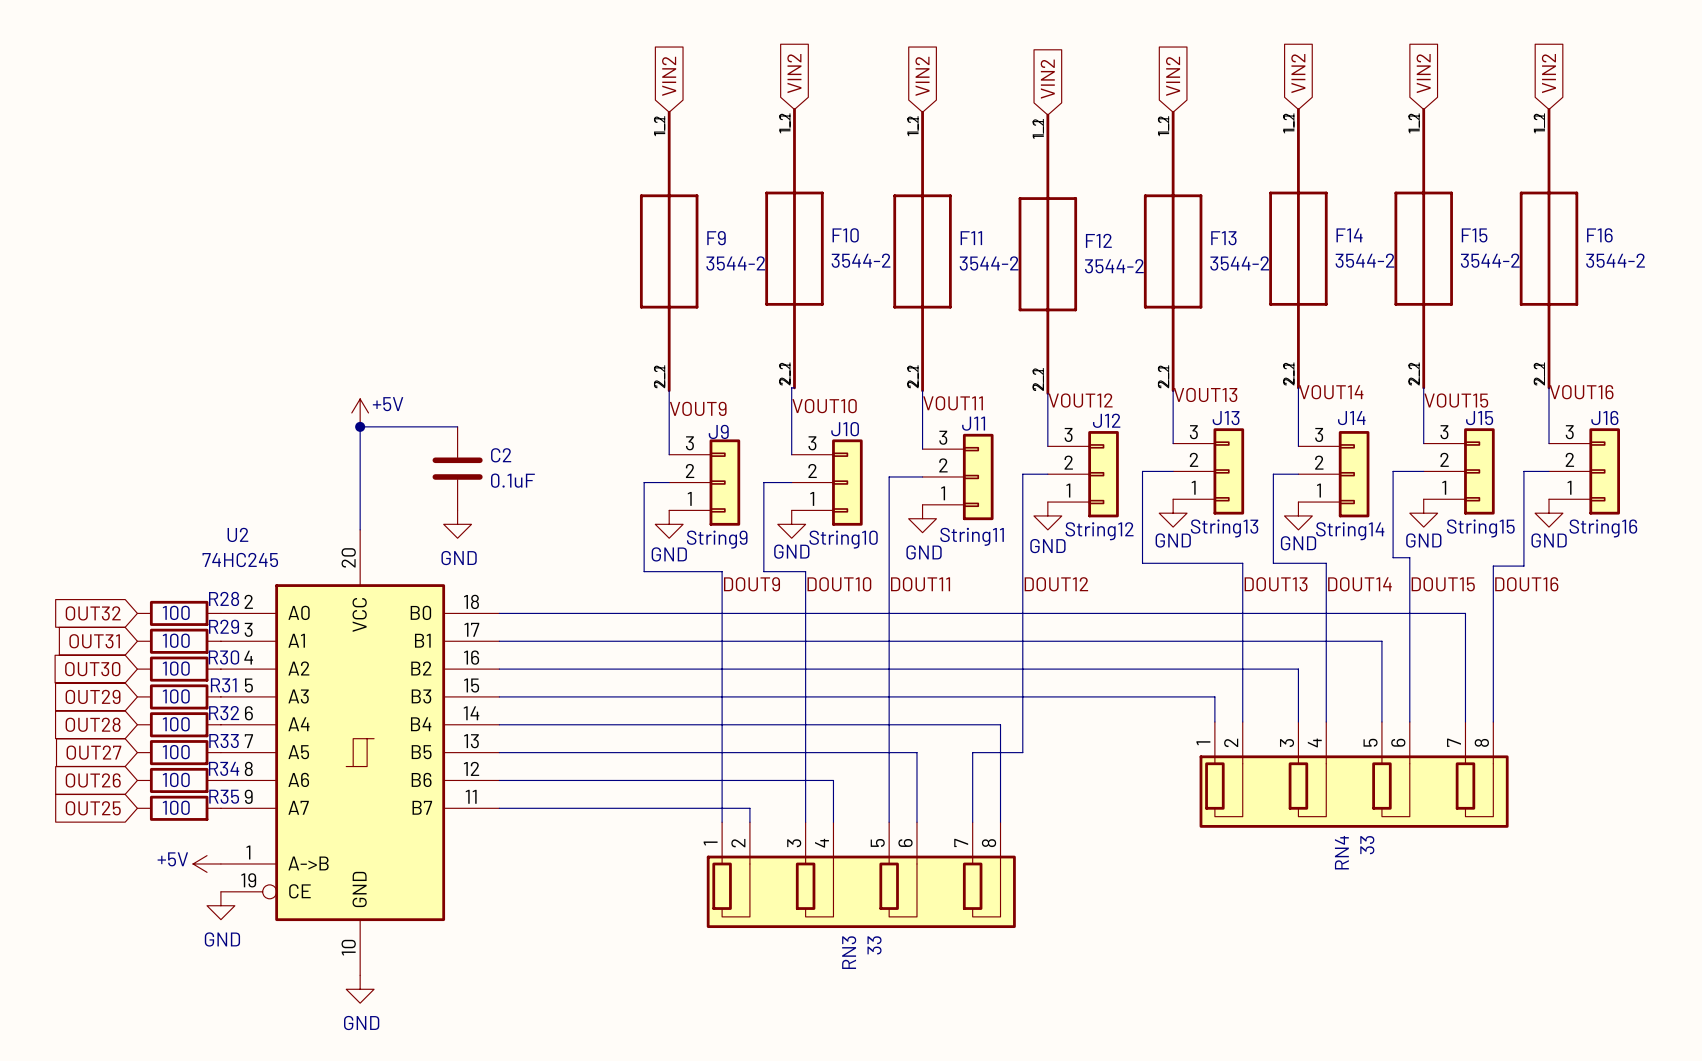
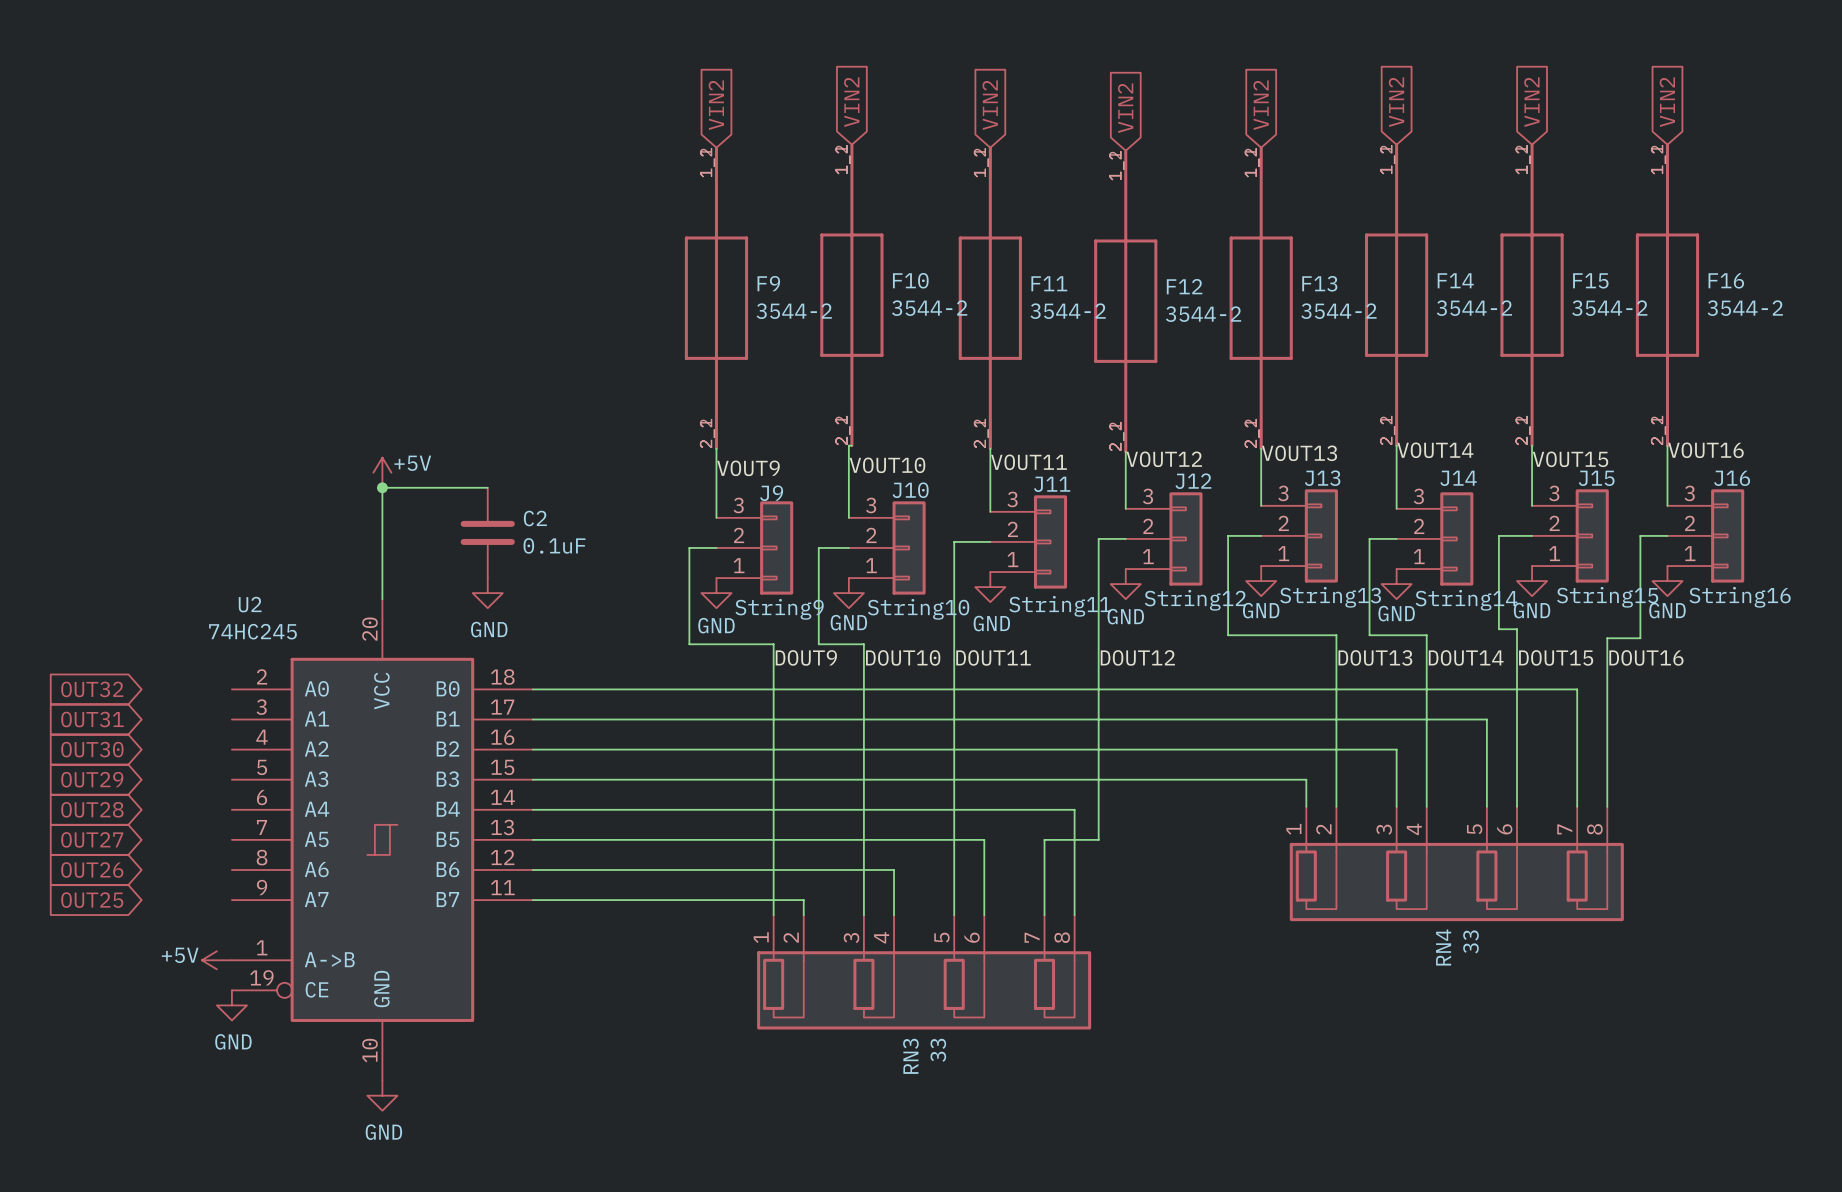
R28: 100 (179, 613) -> none
R29: 100 (179, 641) -> none
R30: 100 (179, 669) -> none
R31: 100 (179, 696) -> none
R32: 100 (179, 724) -> none
R33: 100 (179, 752) -> none
R34: 100 (179, 780) -> none
R35: 100 (179, 808) -> none

